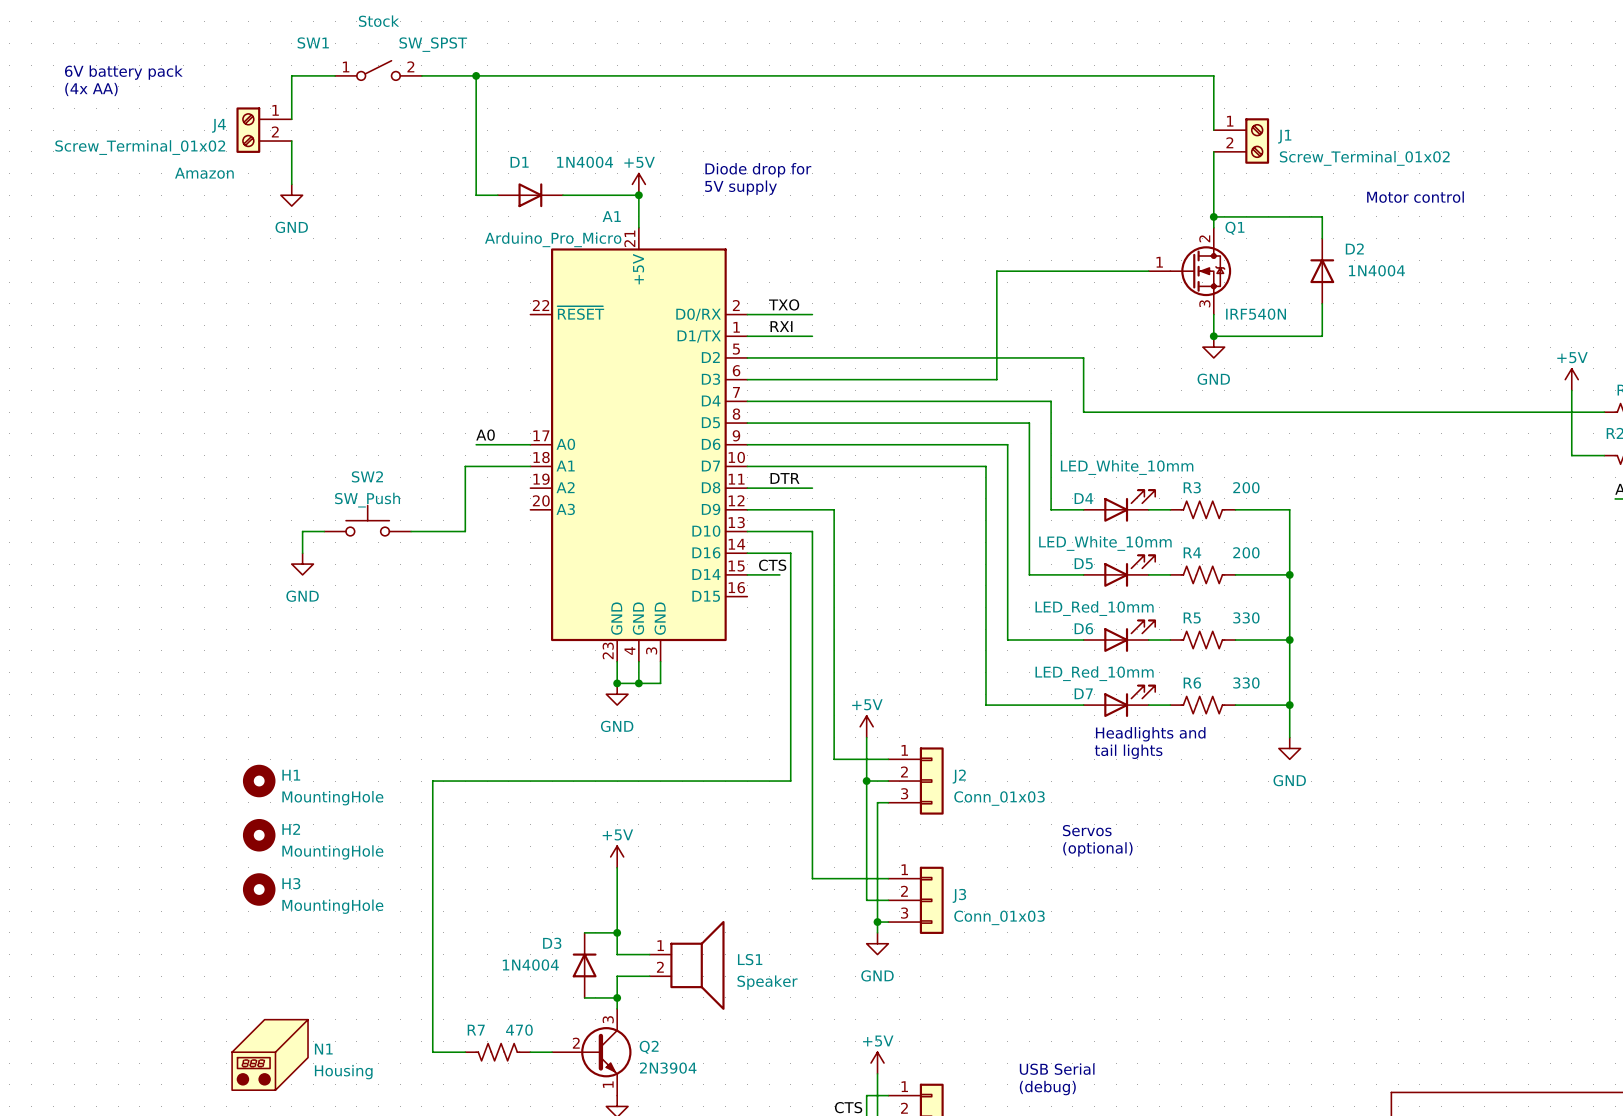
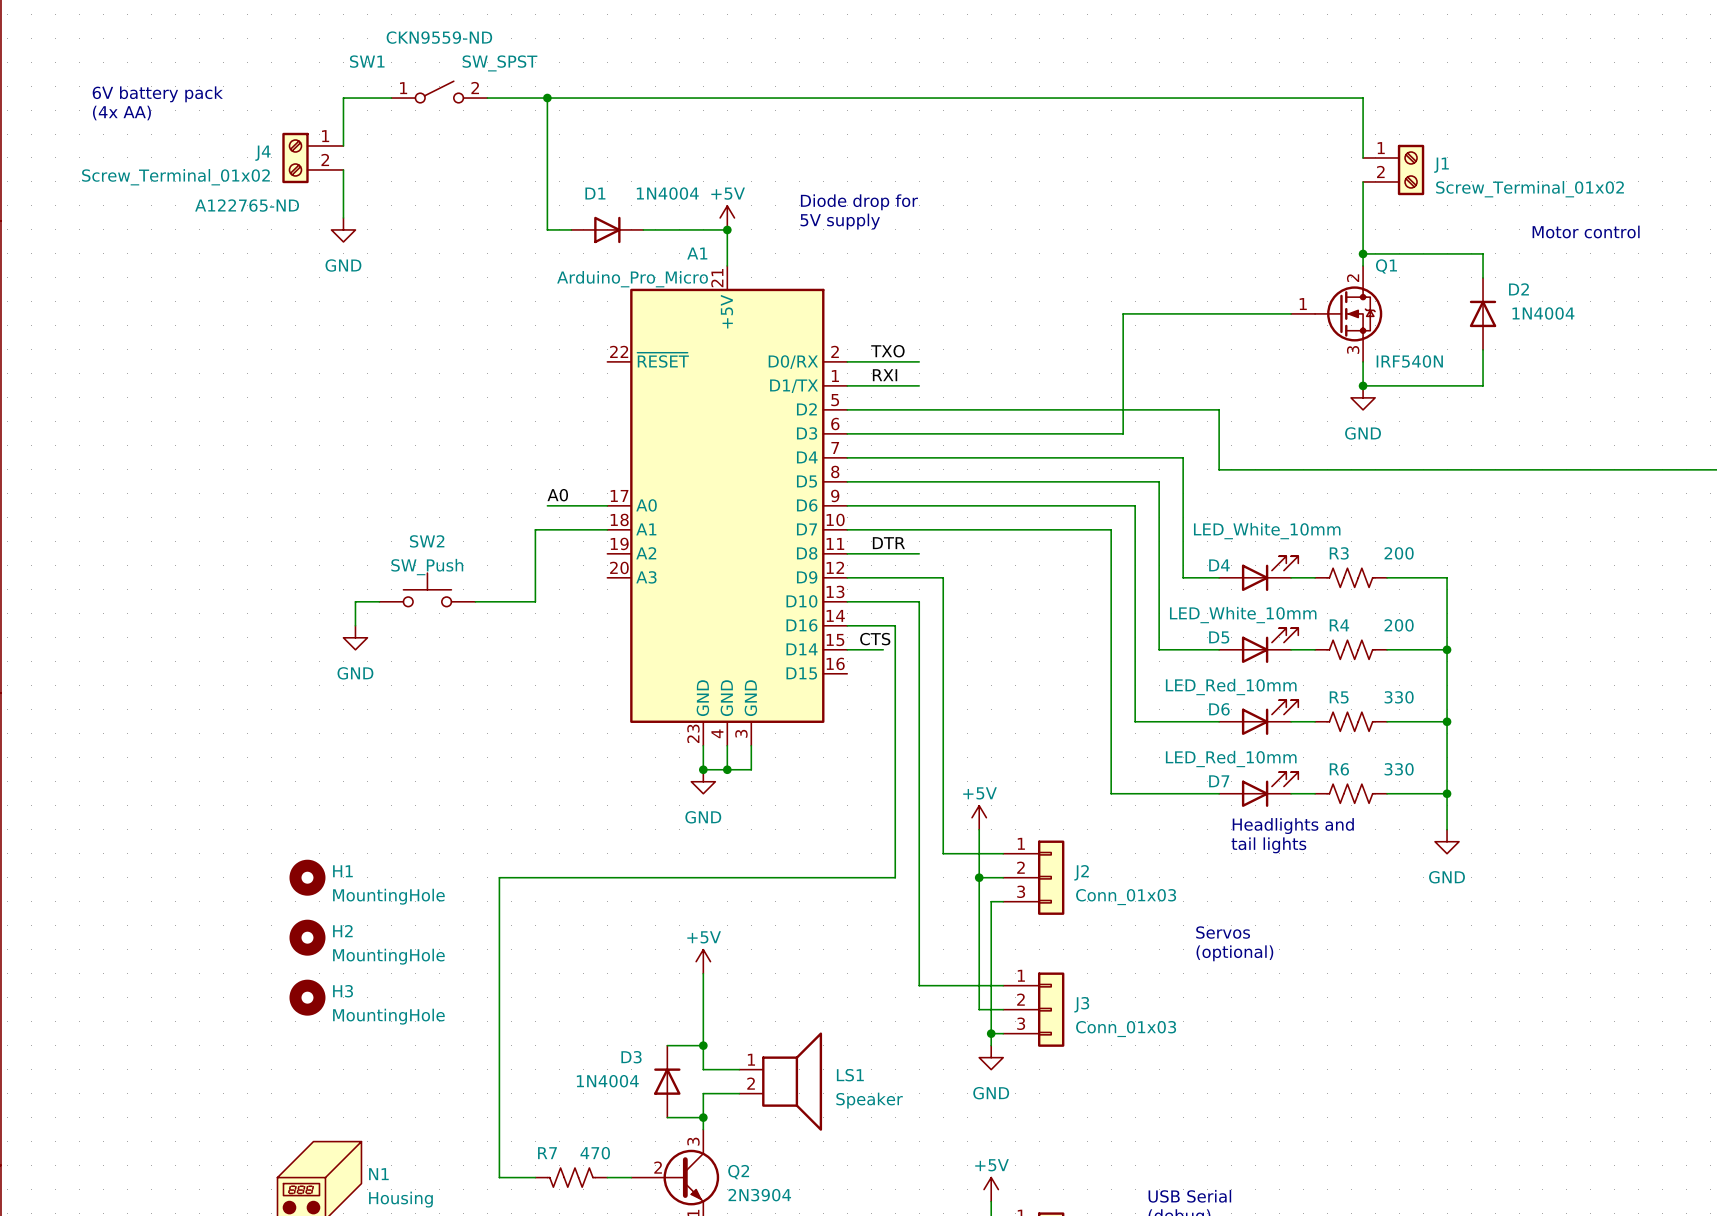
SW1 text: Stock (379, 21) -> CKN9559-ND (439, 37)
J4 text: Amazon (204, 173) -> A122765-ND (247, 205)

